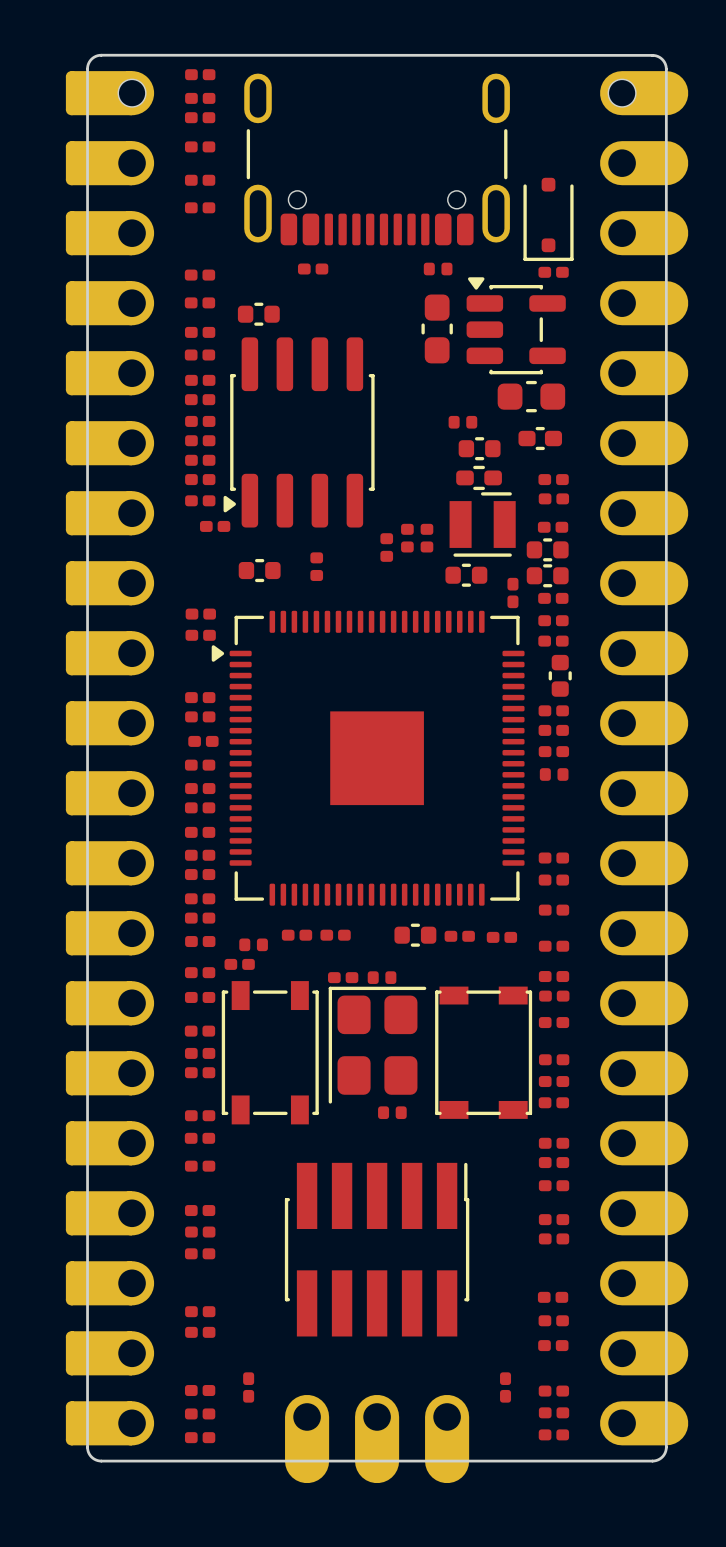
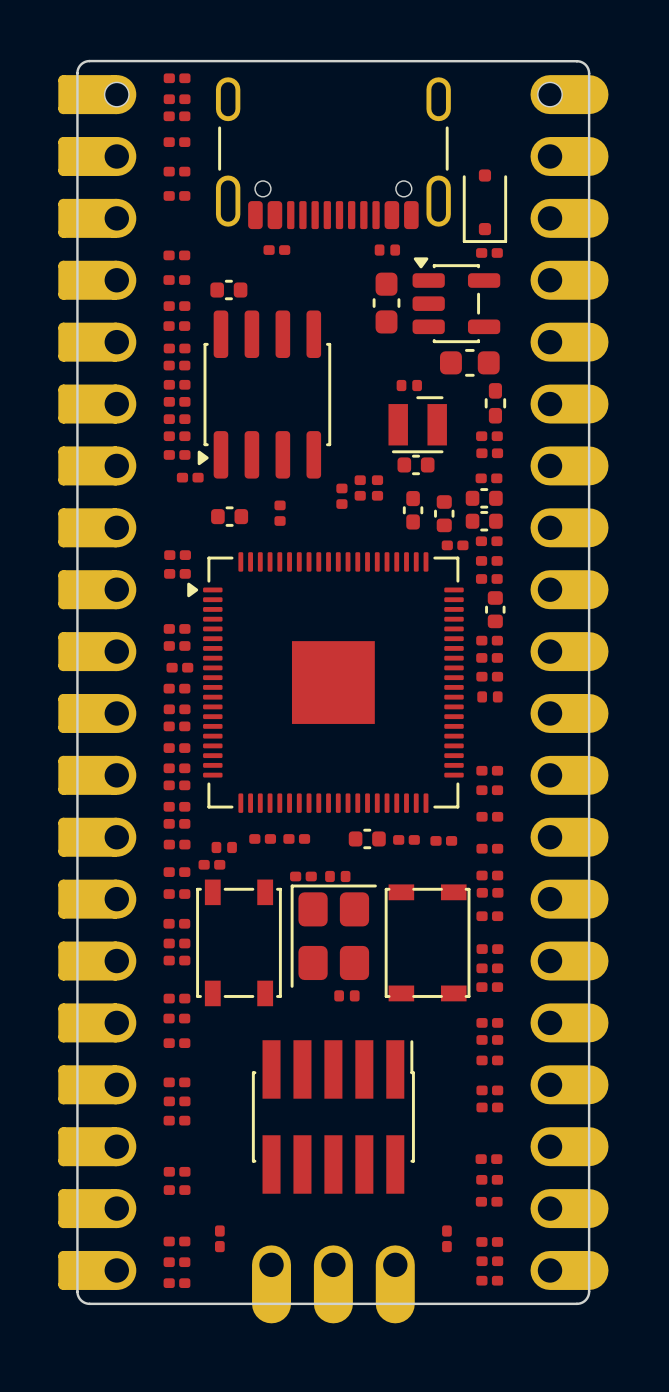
part footprint: [518, 426, 563, 451] -> [484, 383, 507, 424]
part: (479, 448) -> none
part: (479, 477) -> none
part: none -> (416, 464)
part position: (482, 524) -> (417, 424)
part footprint: [445, 563, 488, 587] -> [402, 491, 424, 530]
part: none -> (444, 513)
part rotation: 0° (512, 593) -> 90° clockwise (455, 545)

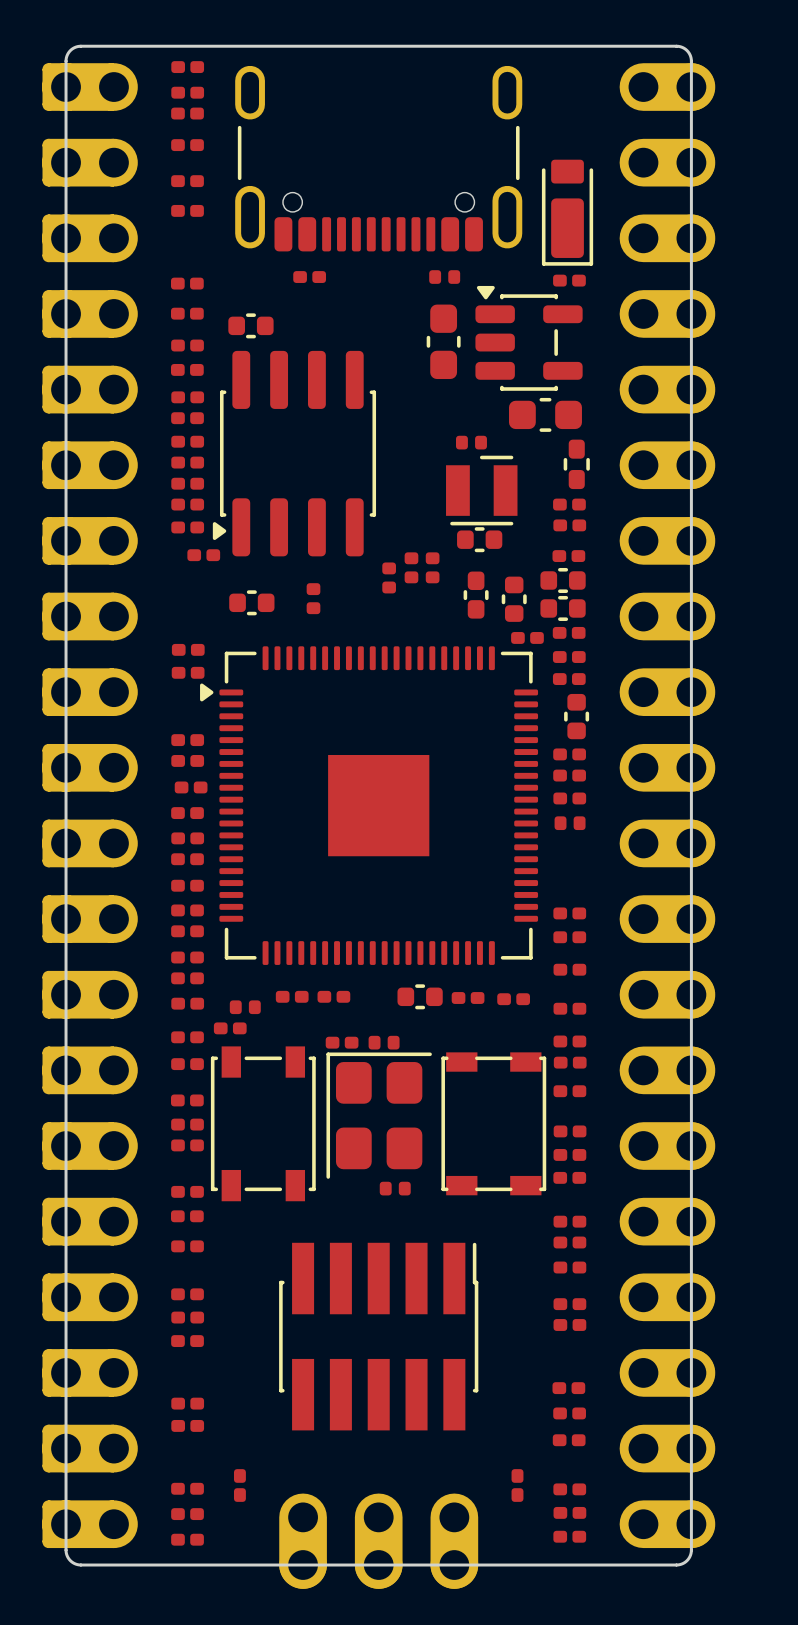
part footprint: [58, 59, 609, 1324] -> [42, 44, 716, 1589]
part footprint: [462, 169, 508, 243] -> [541, 159, 594, 266]

